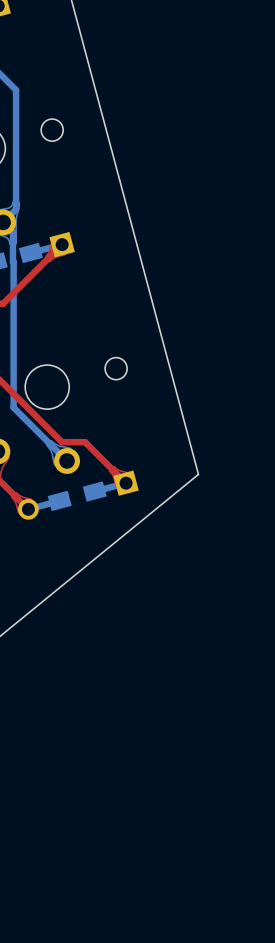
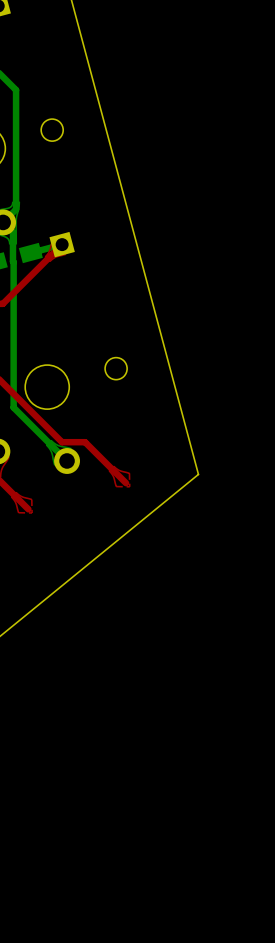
part: (78, 495) -> none

